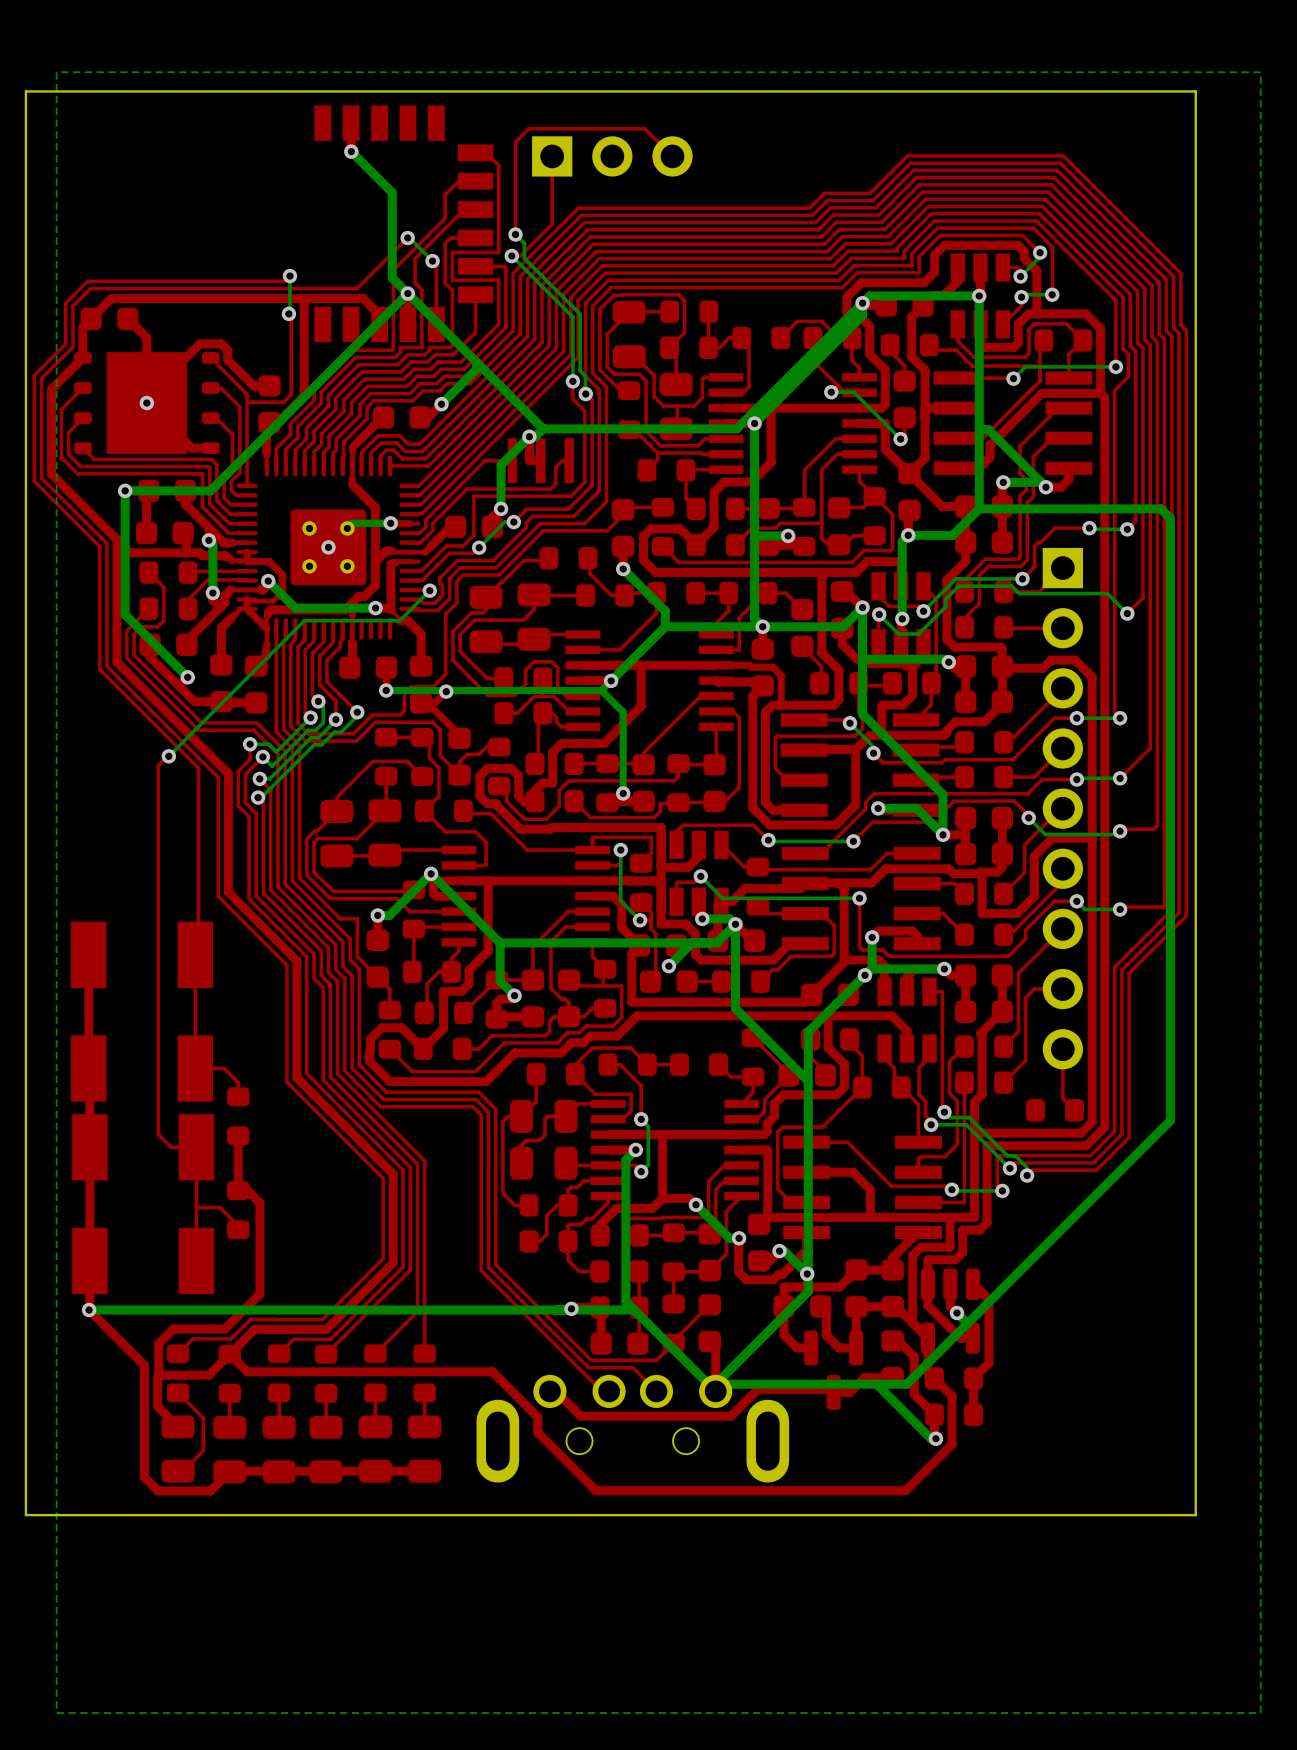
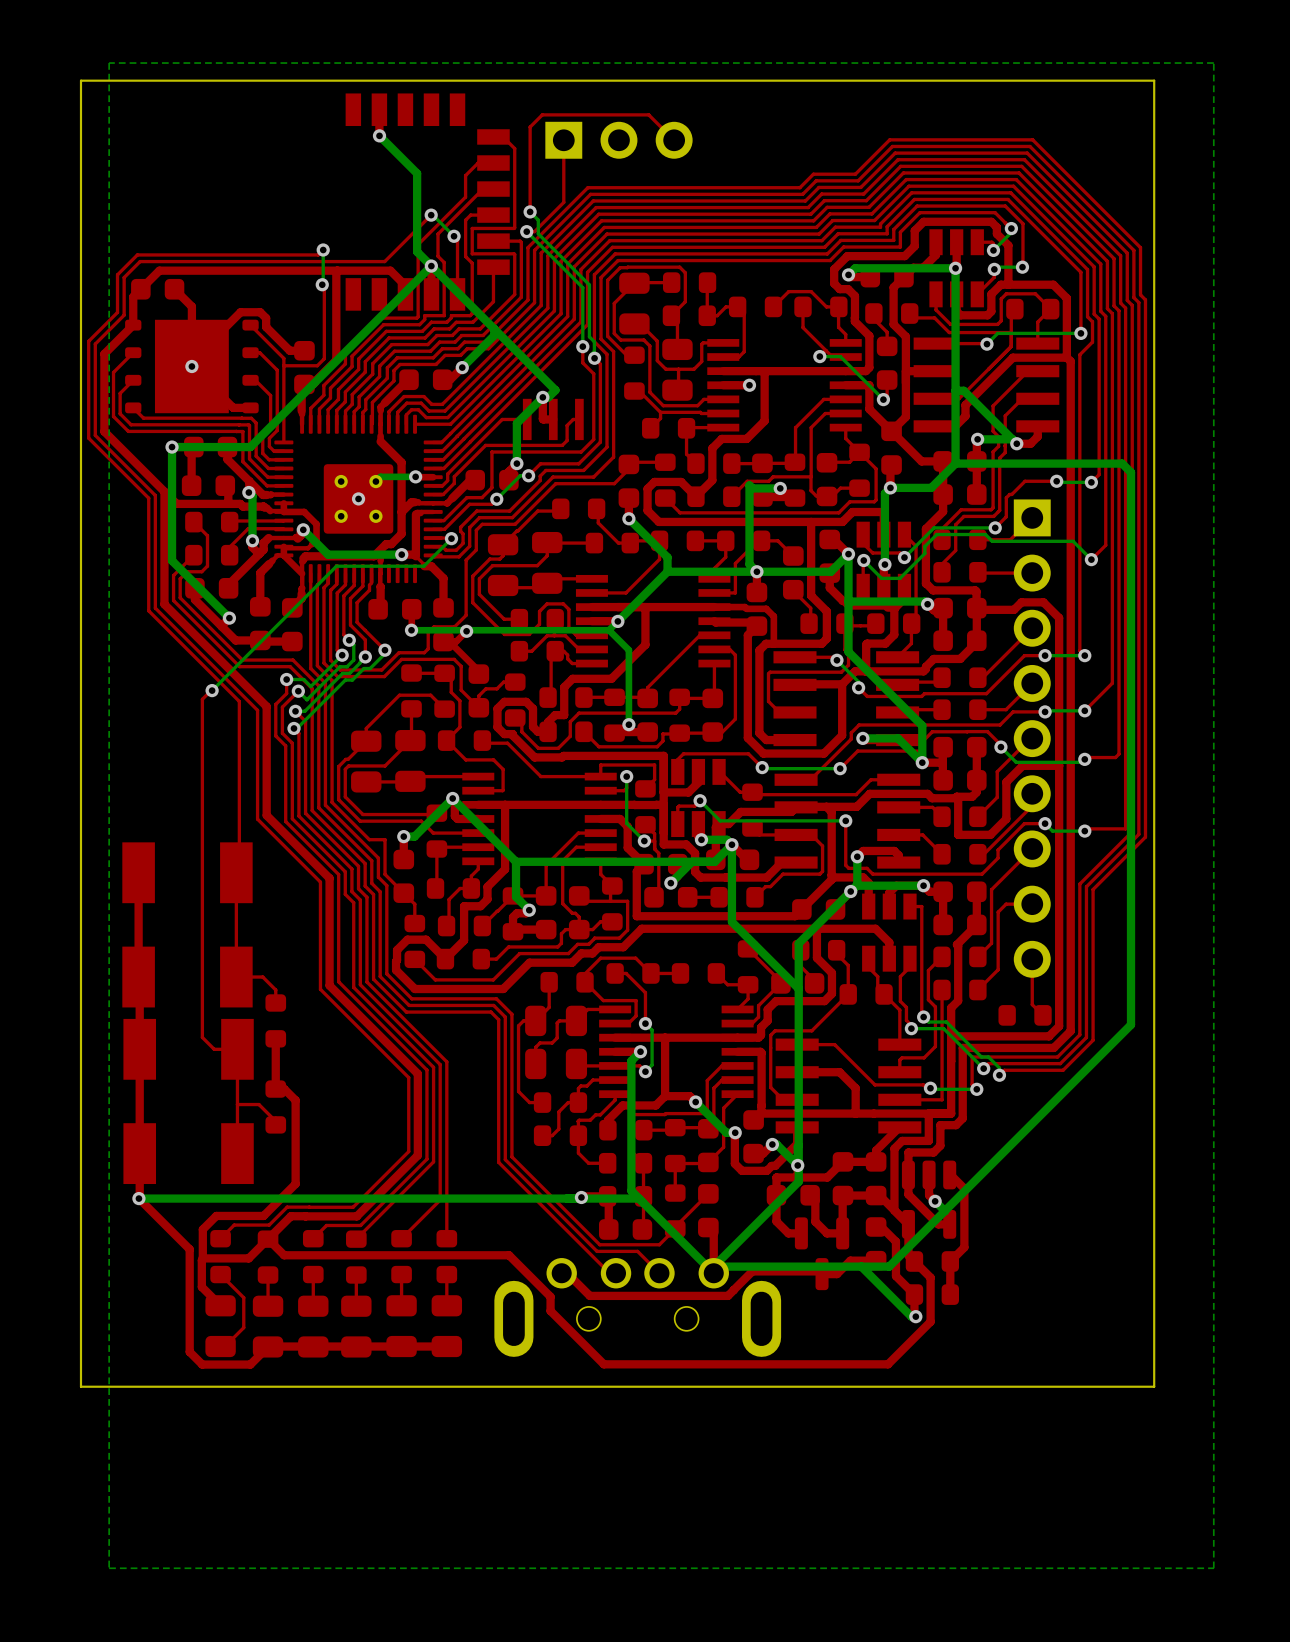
bottom track: (543, 428) (736, 428) (862, 303) (862, 315) (754, 423) (754, 532) -> none

